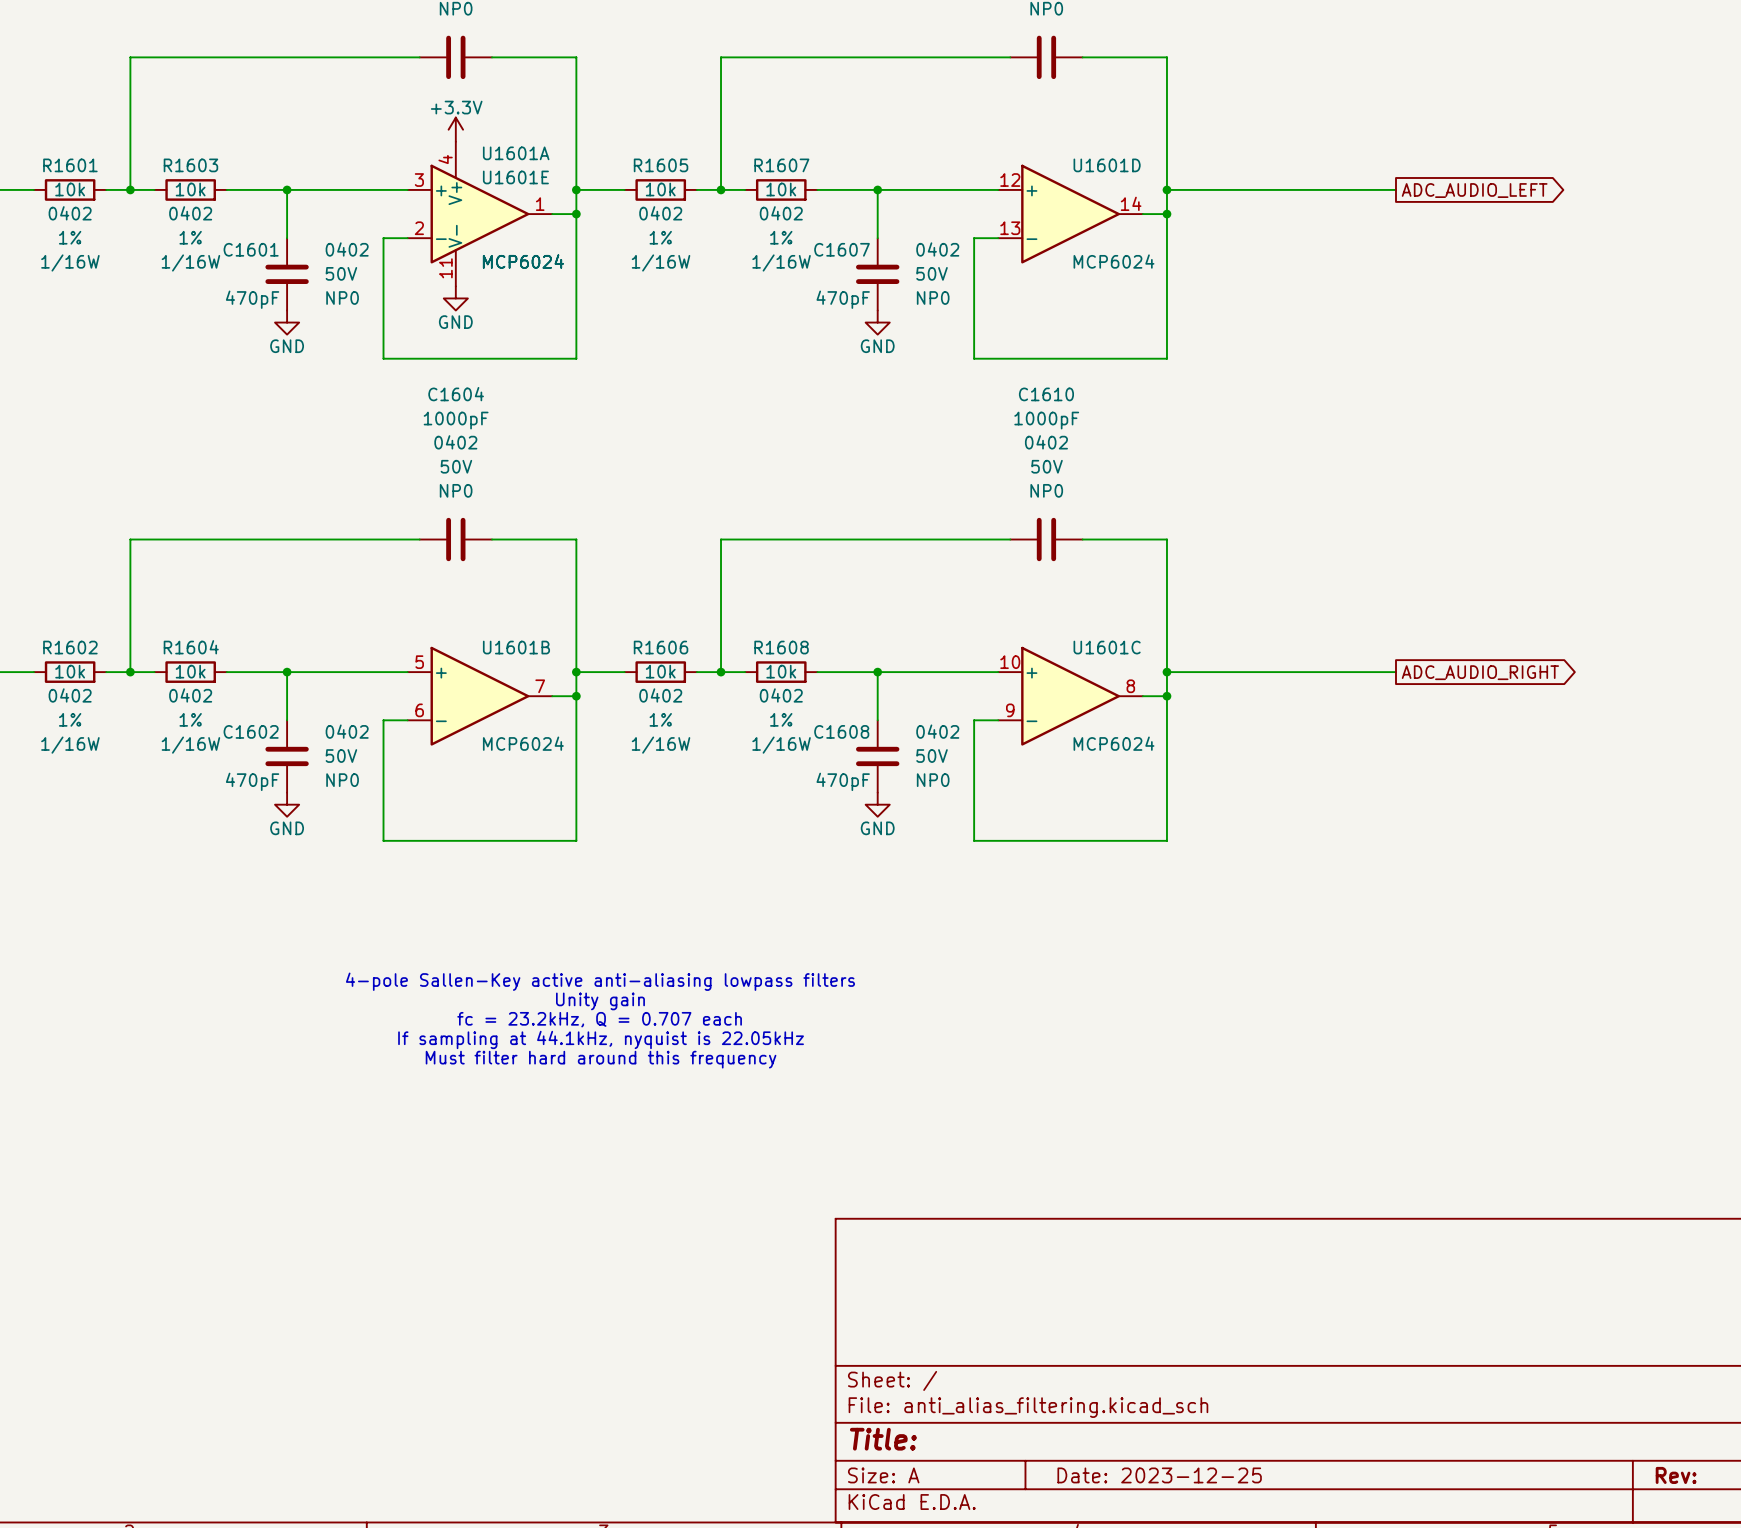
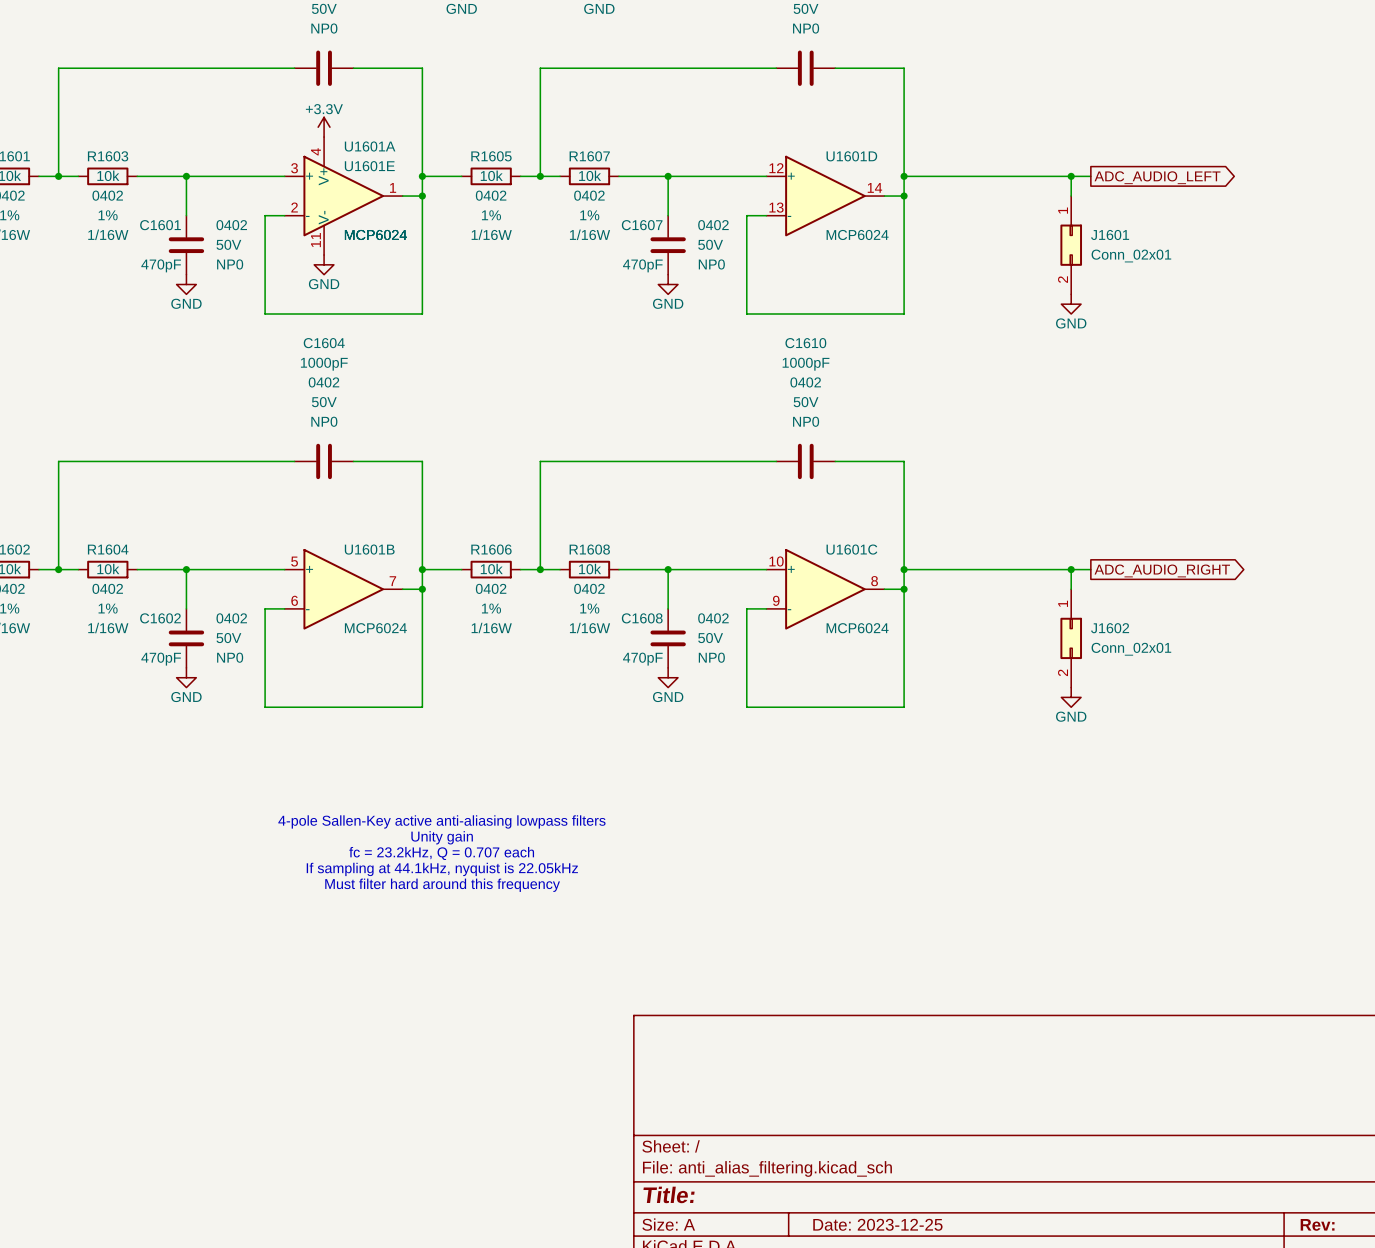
wire: none -> (1071, 176) (1071, 196)
junction: none -> (1071, 176)
J1601: none -> Conn_02x01 (1071, 245)
power symbol: none -> GND (1071, 304)
wire: none -> (1071, 569) (1071, 589)
junction: none -> (1071, 569)
J1602: none -> Conn_02x01 (1071, 638)
power symbol: none -> GND (1071, 697)

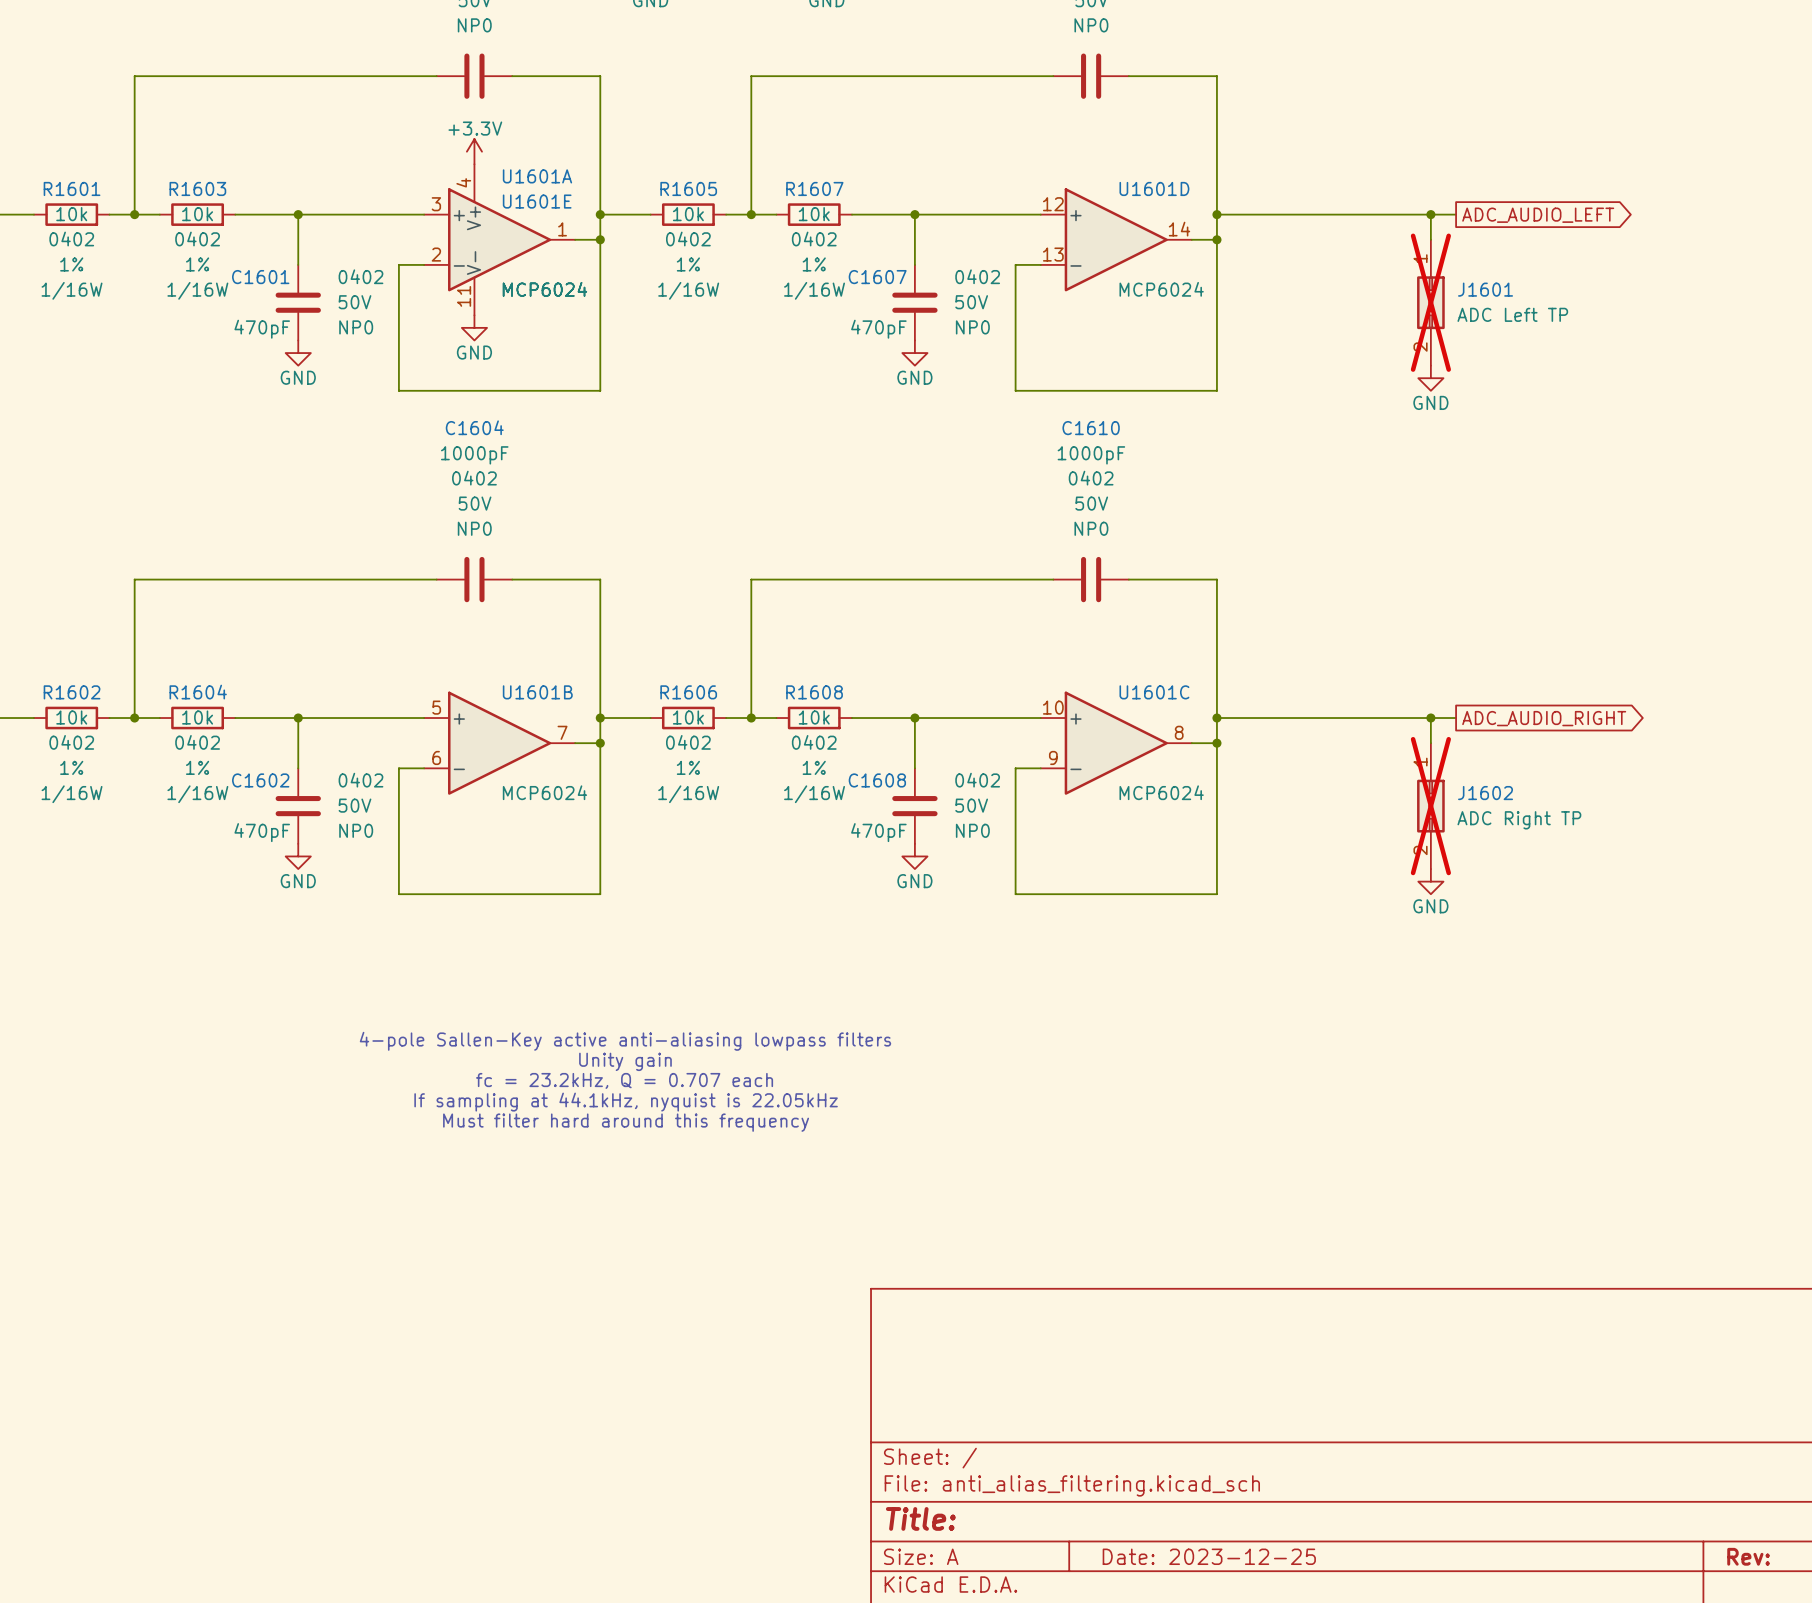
J1601 do-not-place cross: none -> (1430, 302)
J1601 value: Conn_02x01 (1131, 255) -> ADC Left TP (1512, 314)
J1602 do-not-place cross: none -> (1430, 806)
J1602 value: Conn_02x01 (1131, 649) -> ADC Right TP (1519, 820)

